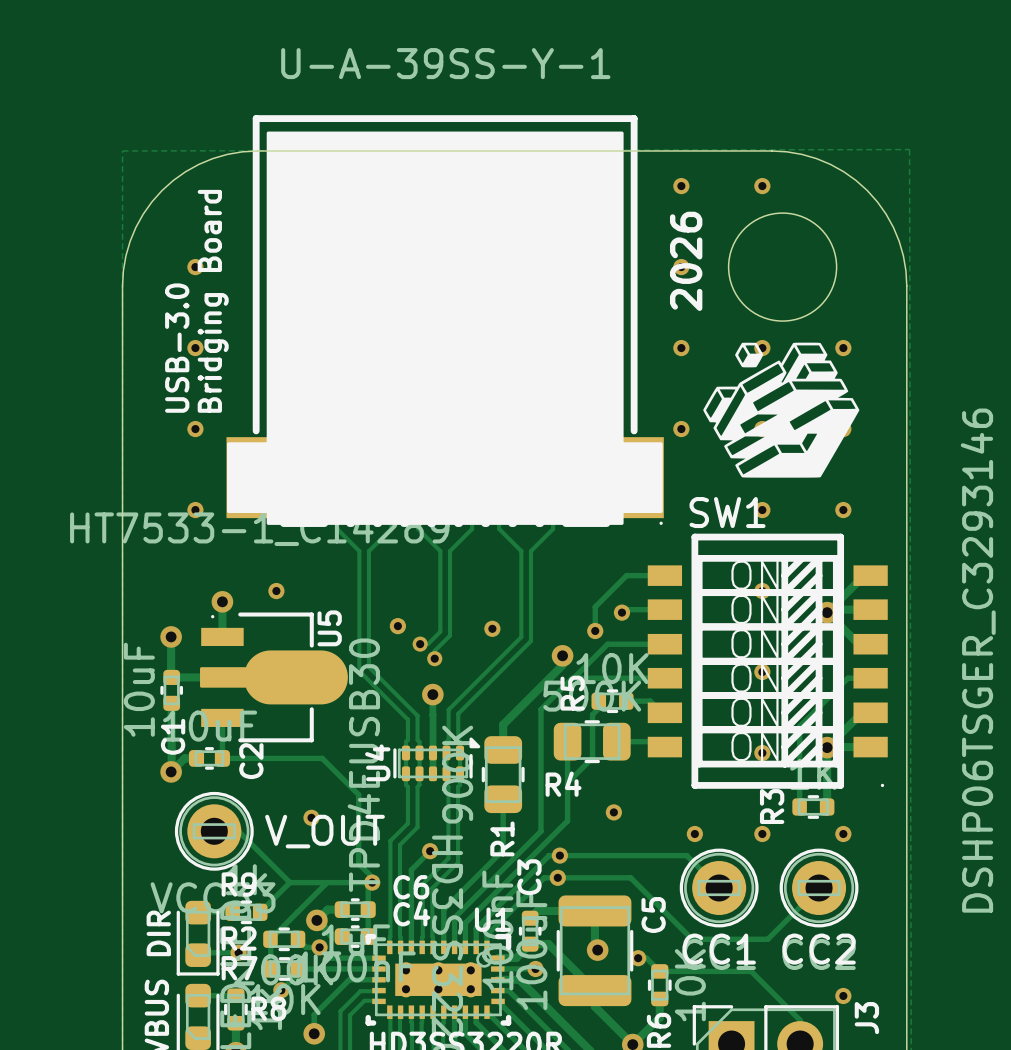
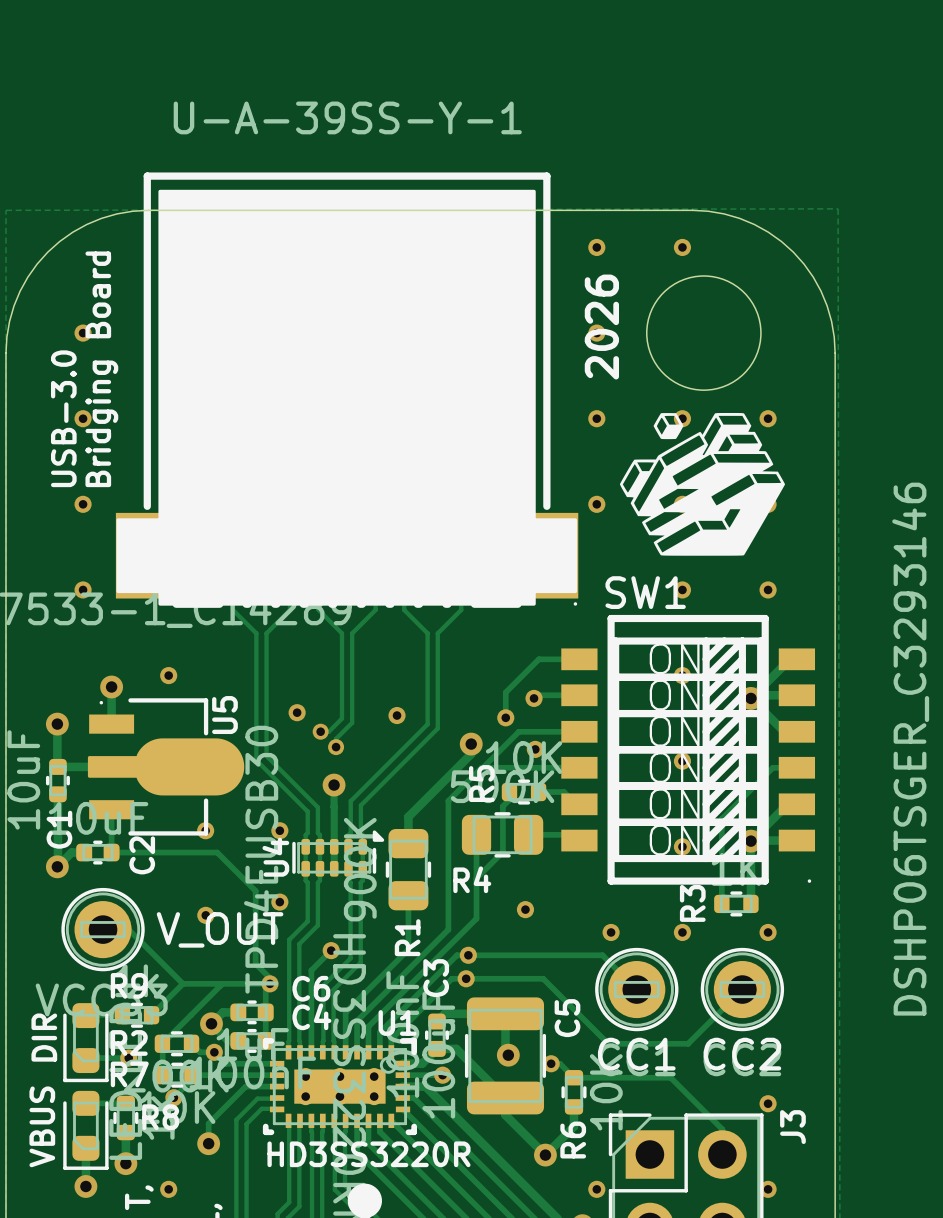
via: none -> (535, 749)
via: none -> (205, 830)
via: none -> (279, 830)
via: none -> (279, 902)

